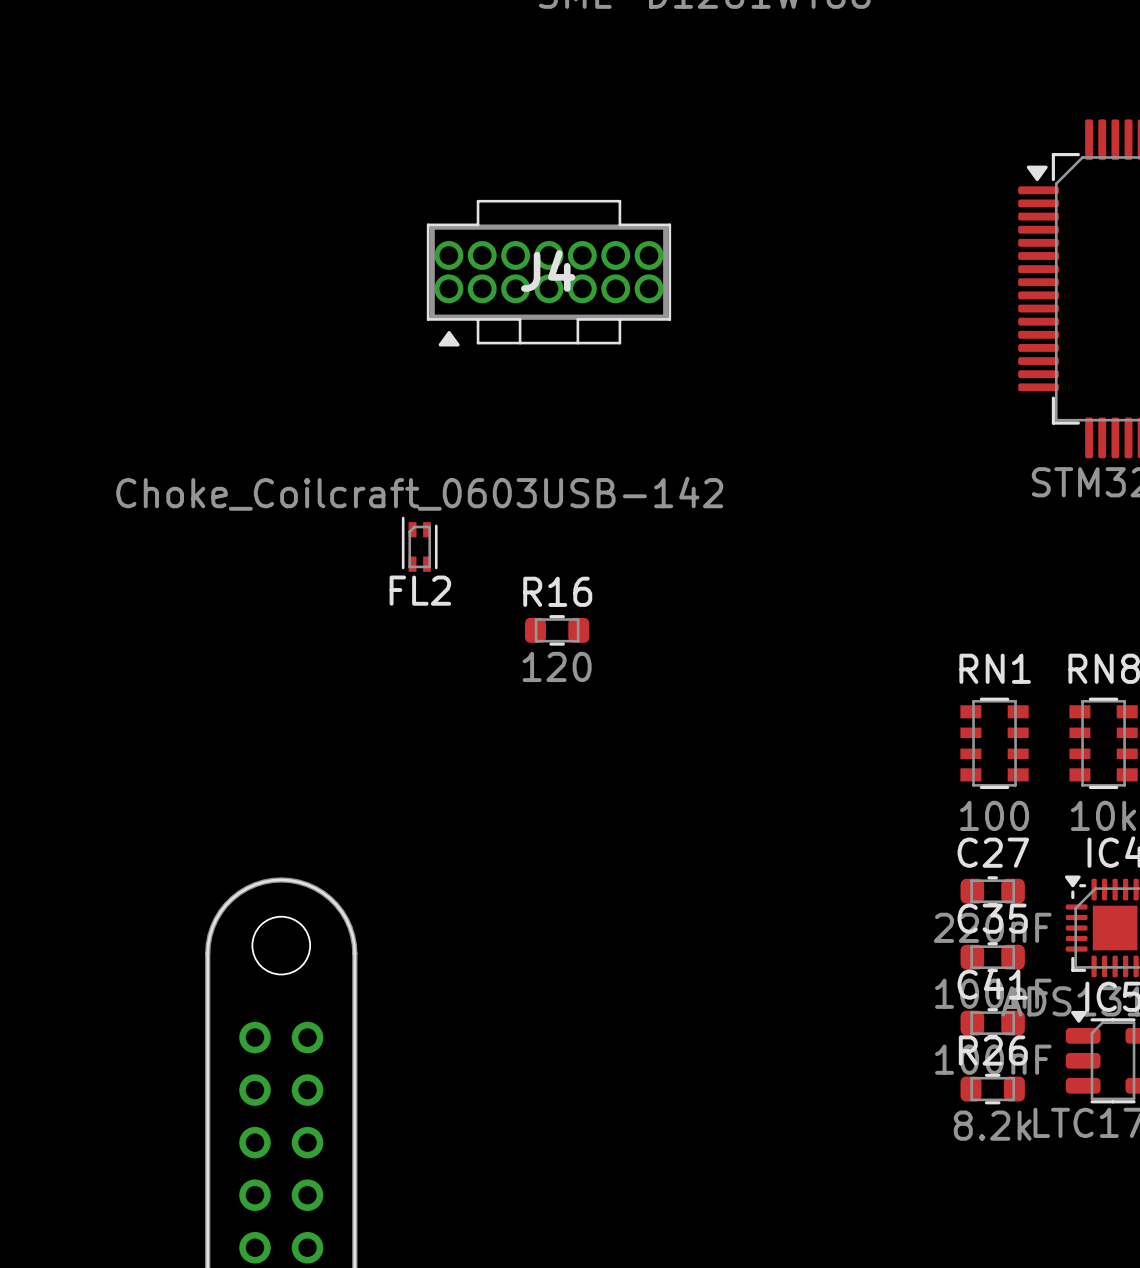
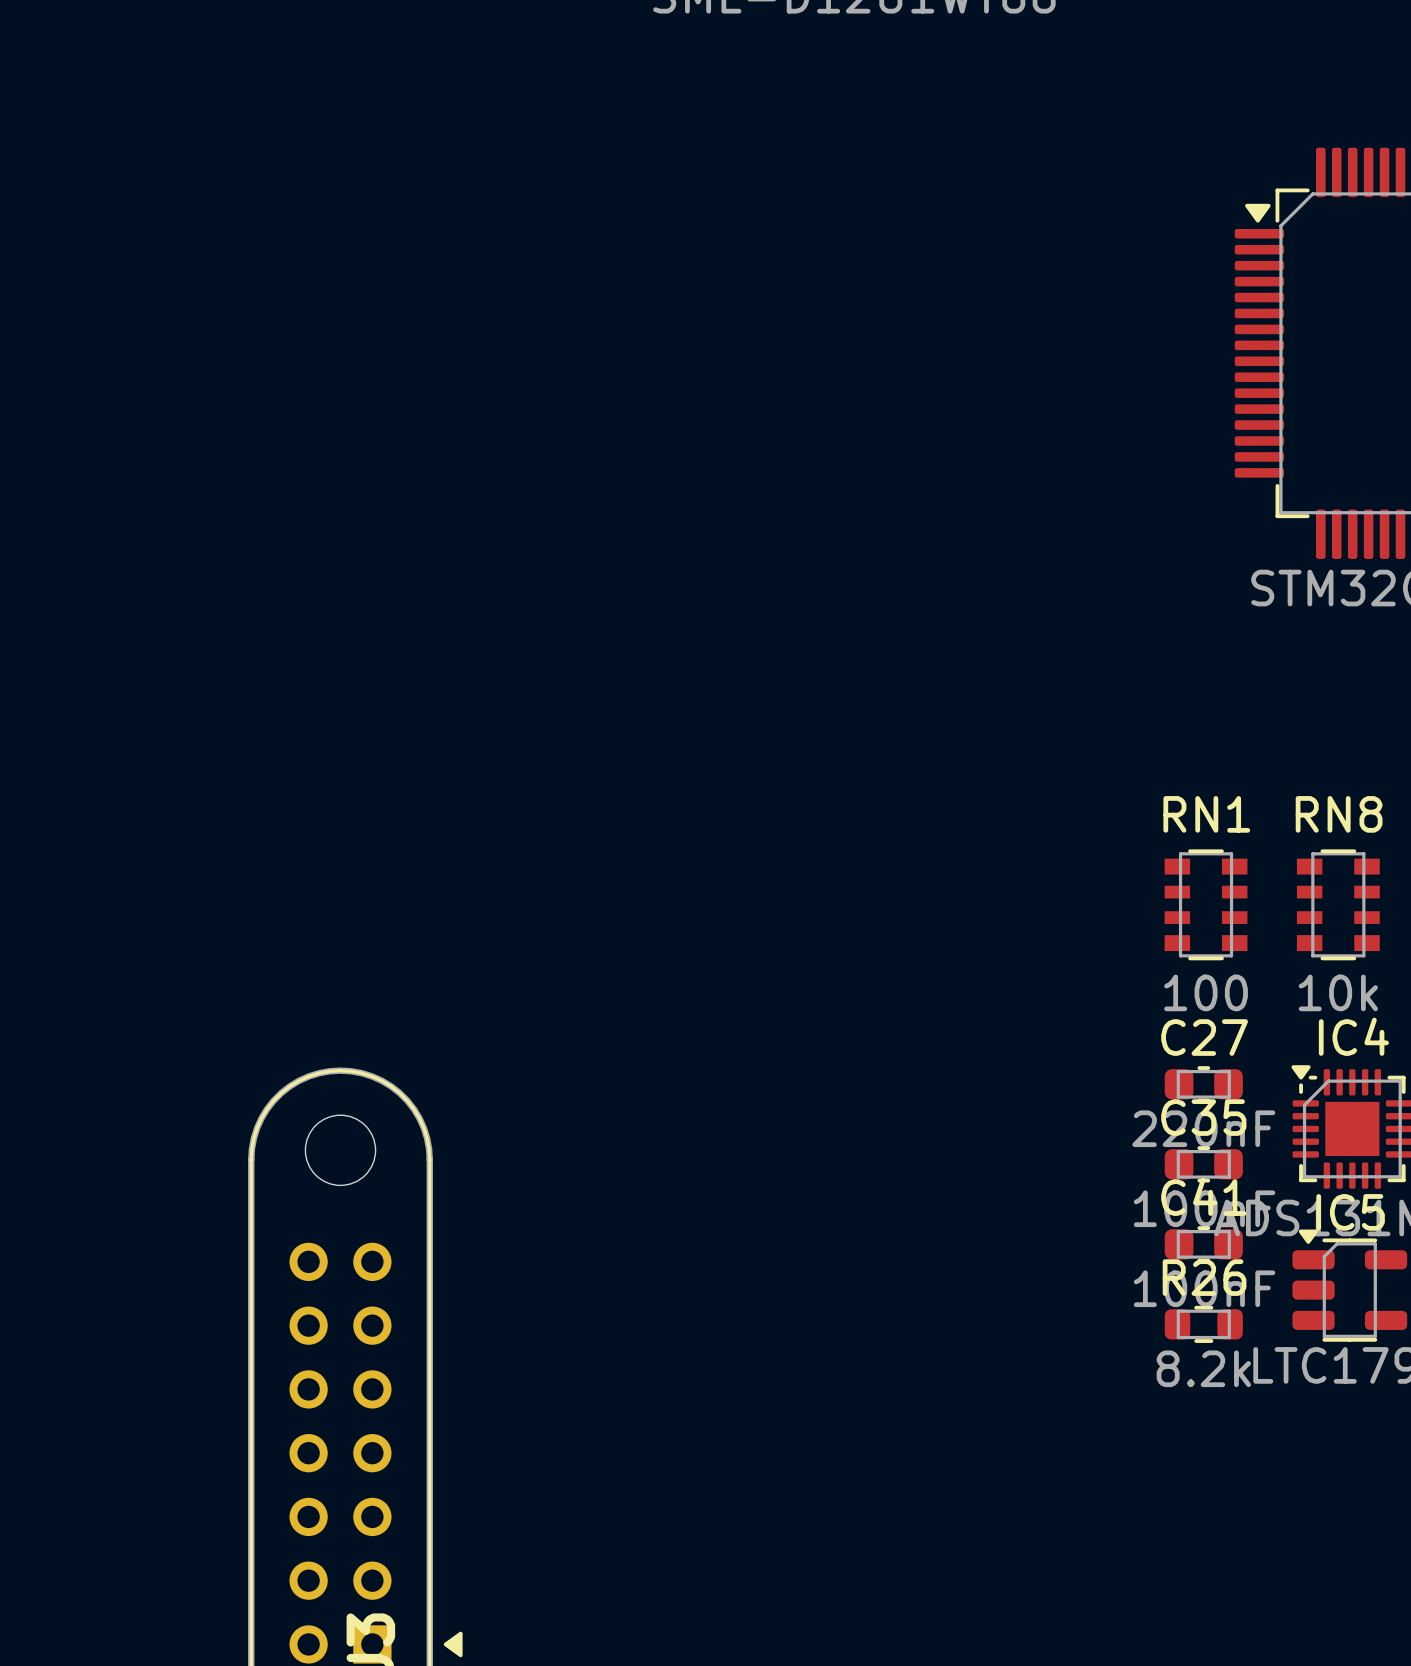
J4: (548, 273) -> none
FL2: Choke_Coilcraft_0603USB-142 (419, 544) -> none
R16: 120 (557, 630) -> none

